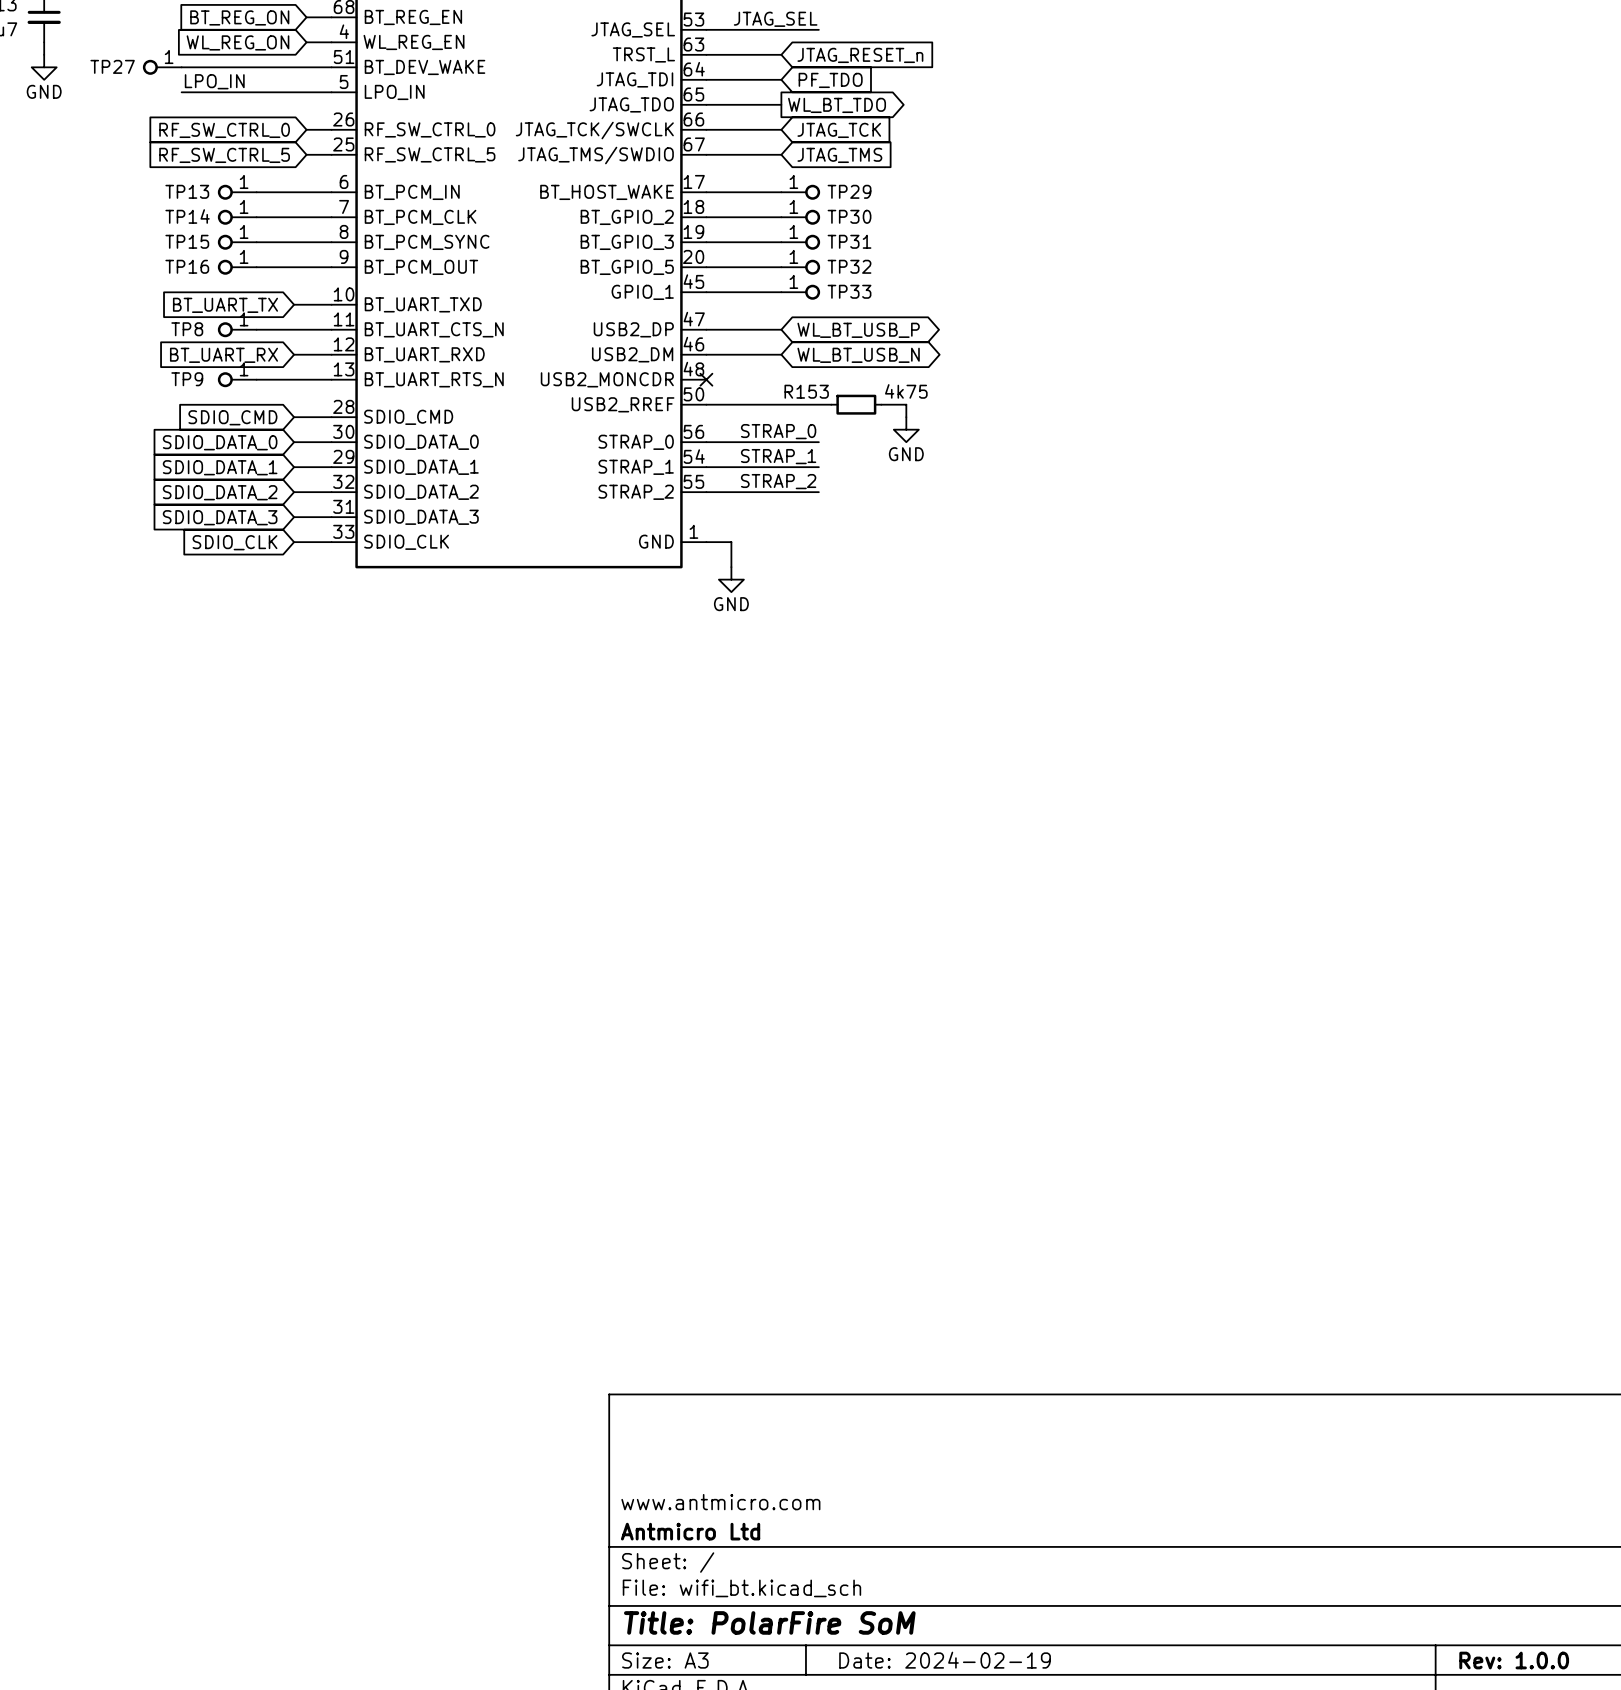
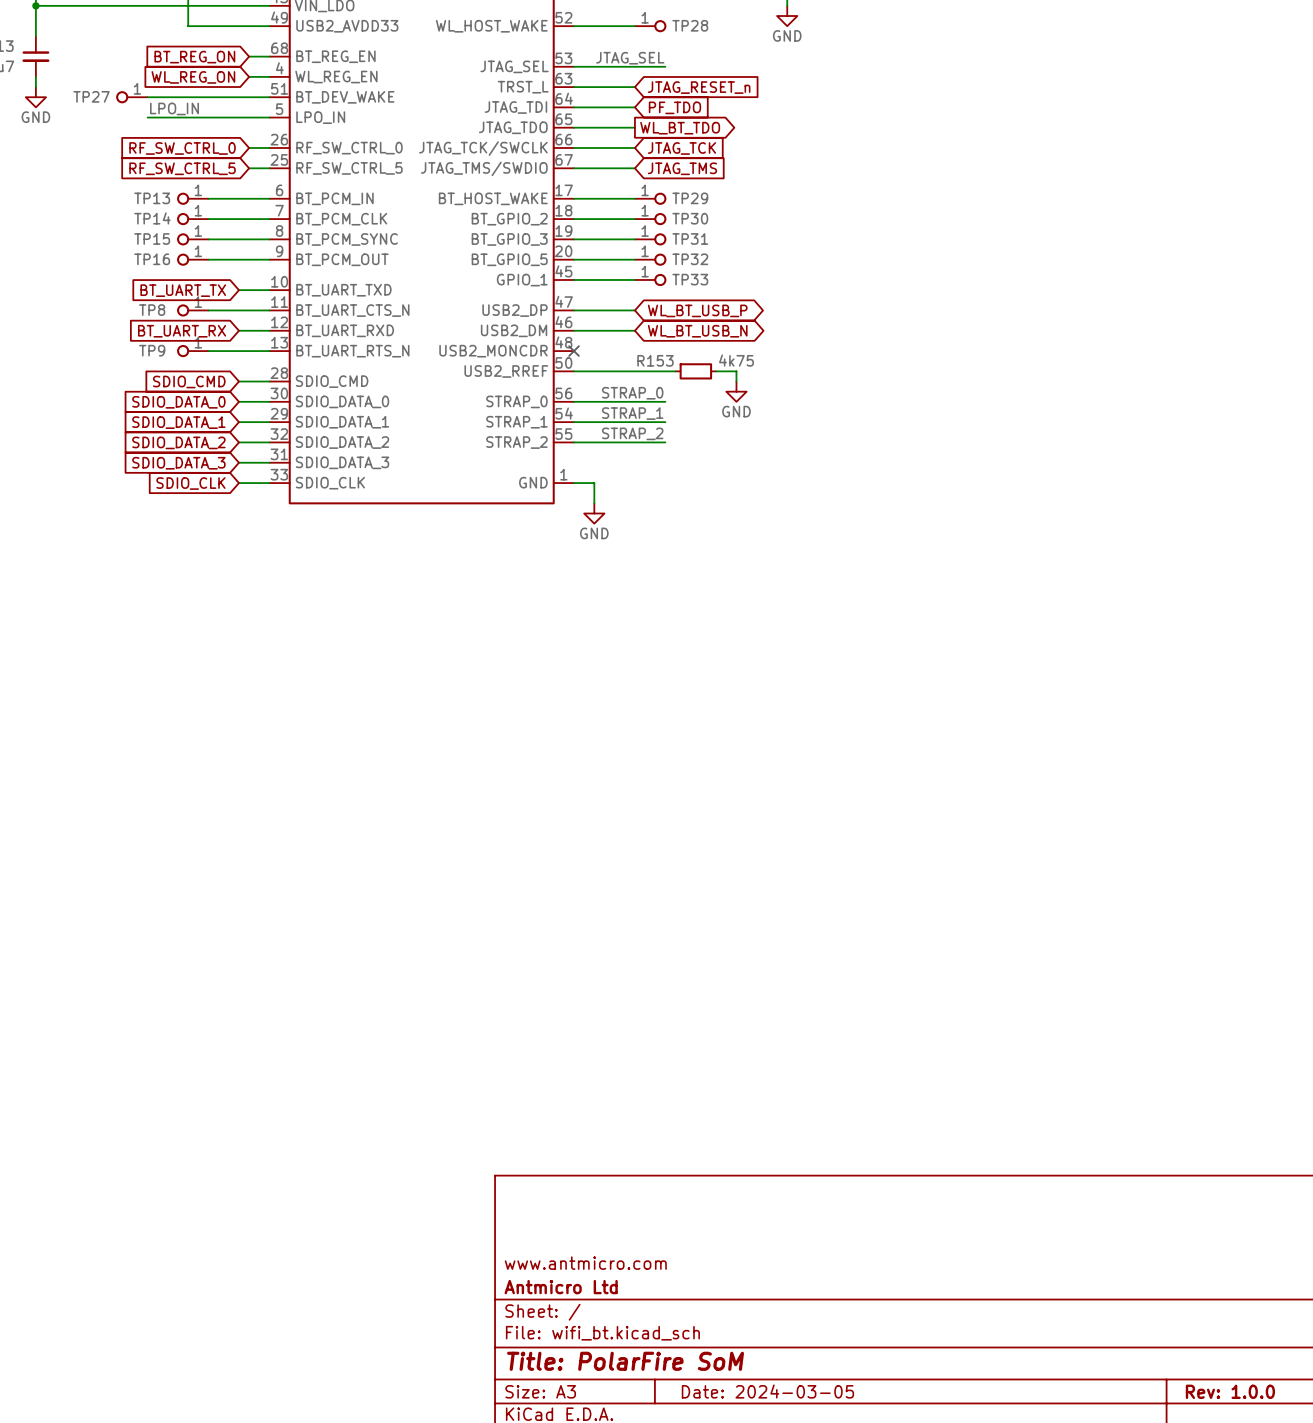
title block: Date: 2024-02-19 (945, 1660) -> Date: 2024-03-05 (767, 1391)

